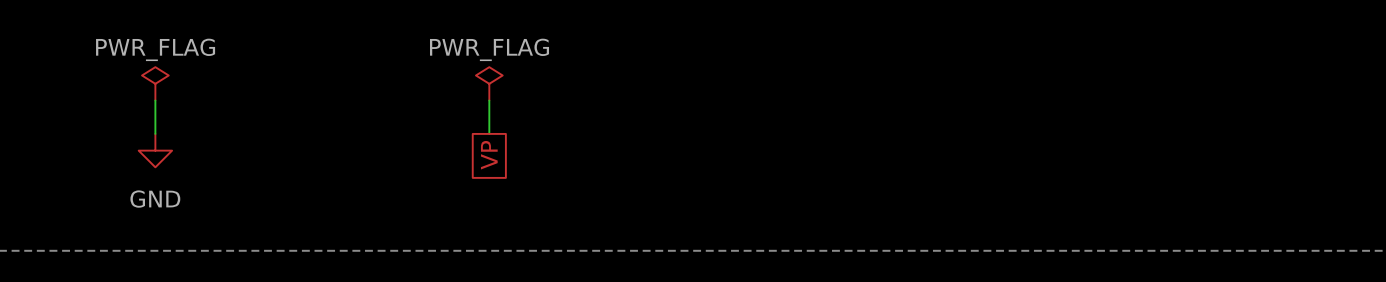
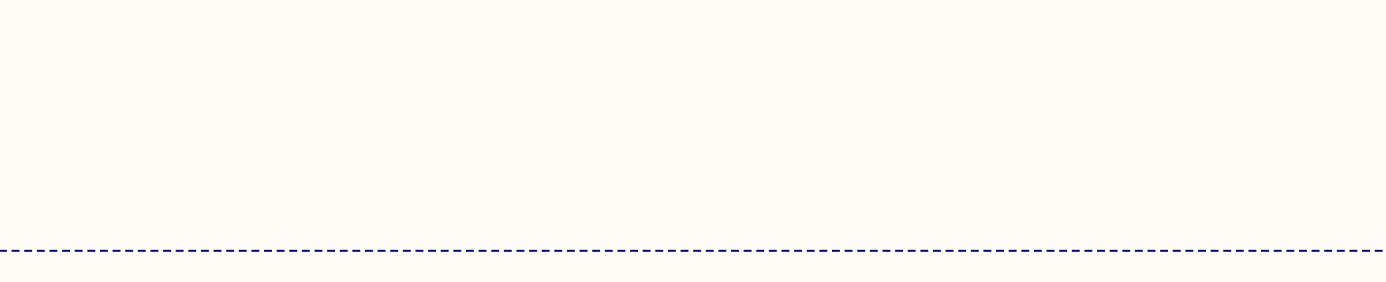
power symbol: PWR_FLAG (155, 83) -> none
power symbol: PWR_FLAG (489, 83) -> none
wire: (155, 100) (155, 133) -> none
wire: (489, 100) (489, 133) -> none
power symbol: GND (155, 150) -> none
global label: VP (489, 155) -> none

